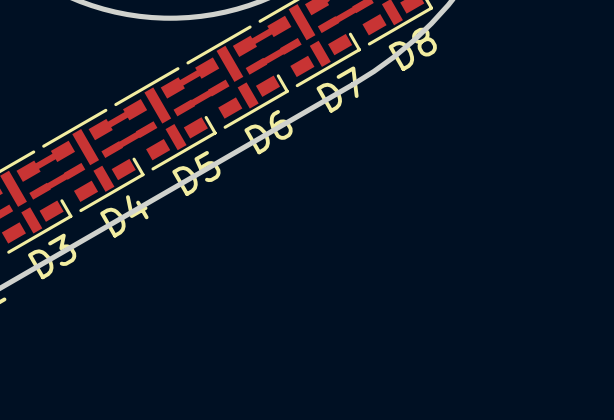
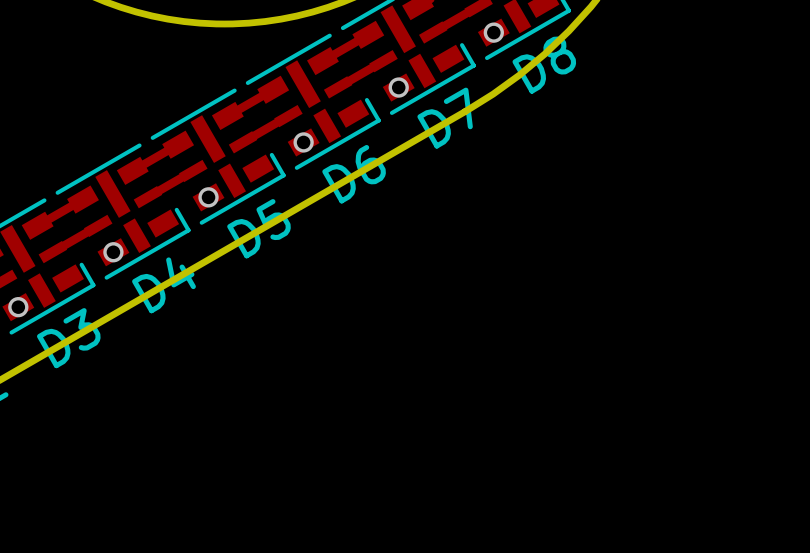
via: none -> (493, 32)
via: none -> (398, 87)
via: none -> (303, 142)
via: none -> (208, 197)
via: none -> (113, 252)
via: none -> (18, 307)

